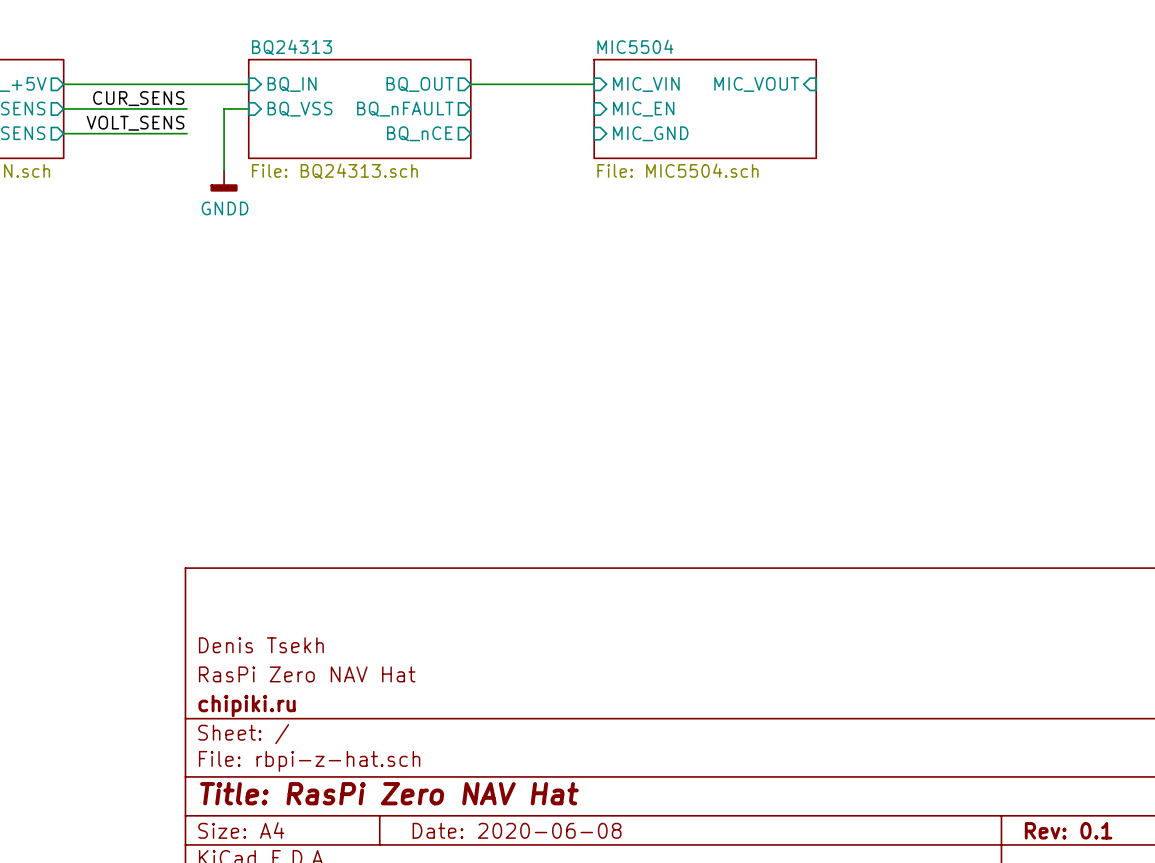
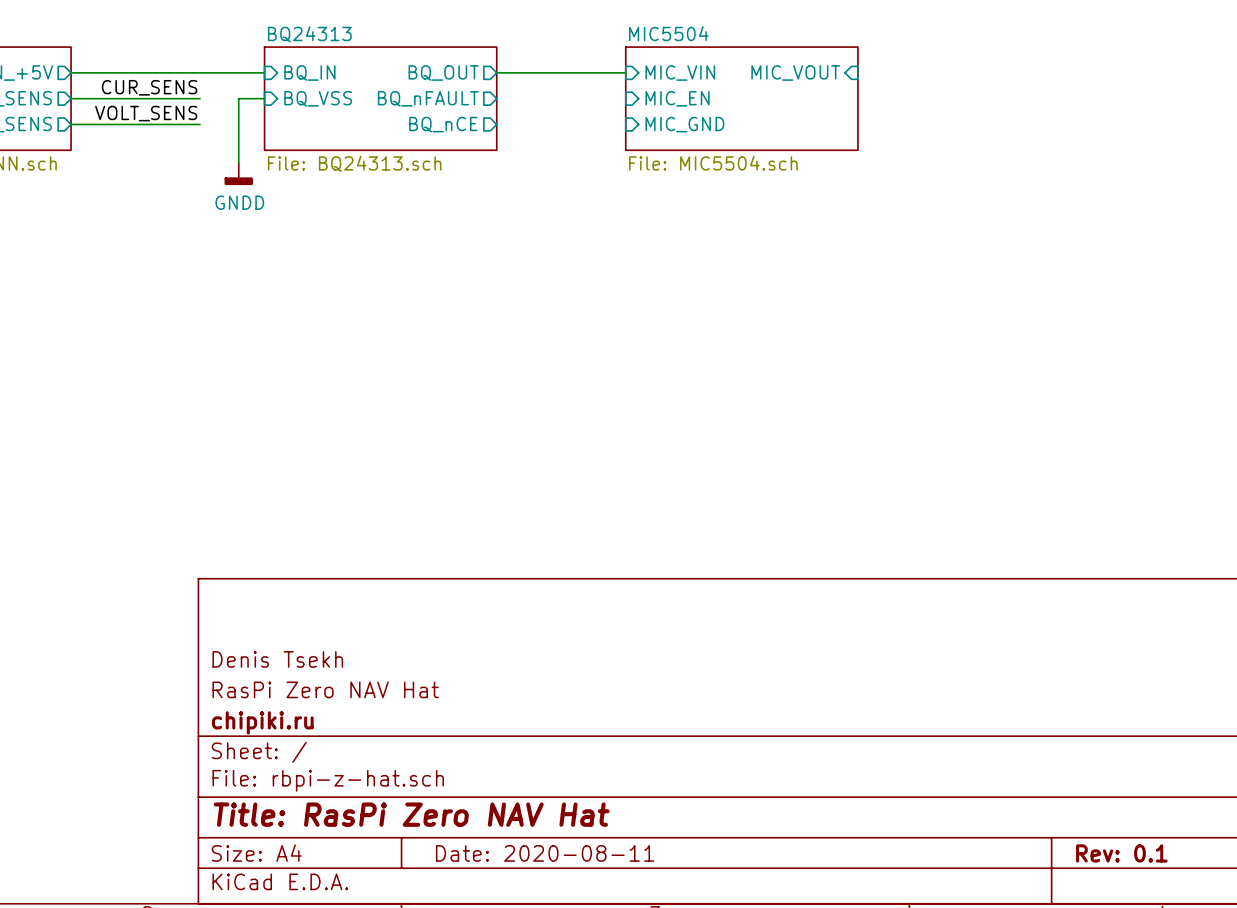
title block: Date: 2020-06-08 (517, 830) -> Date: 2020-08-11 (545, 853)

